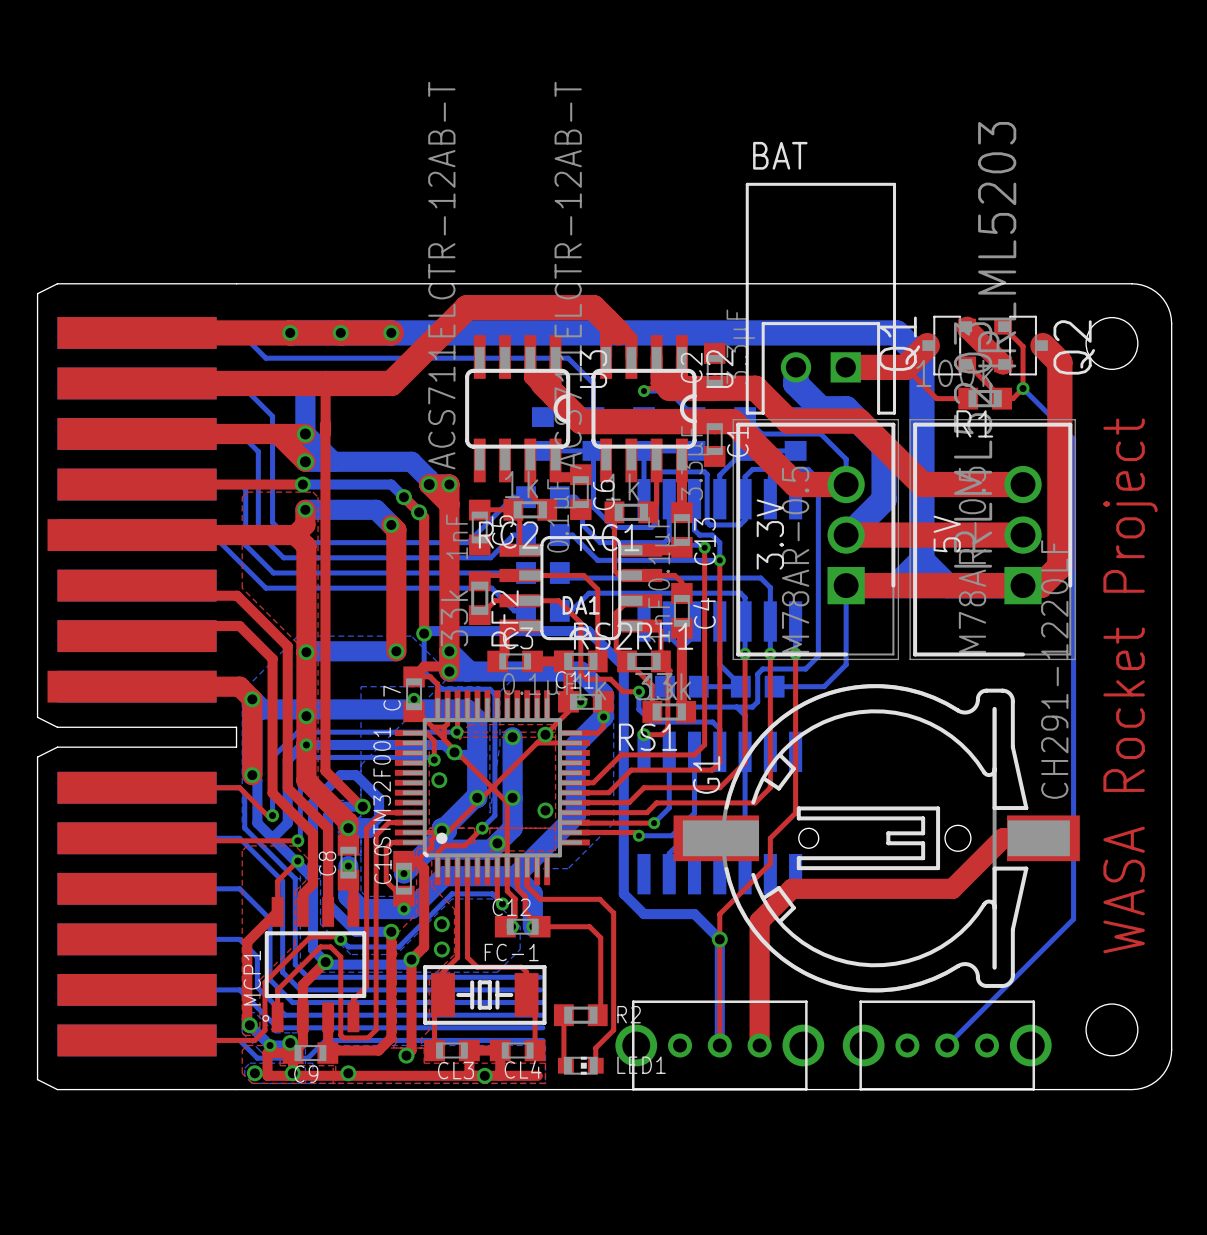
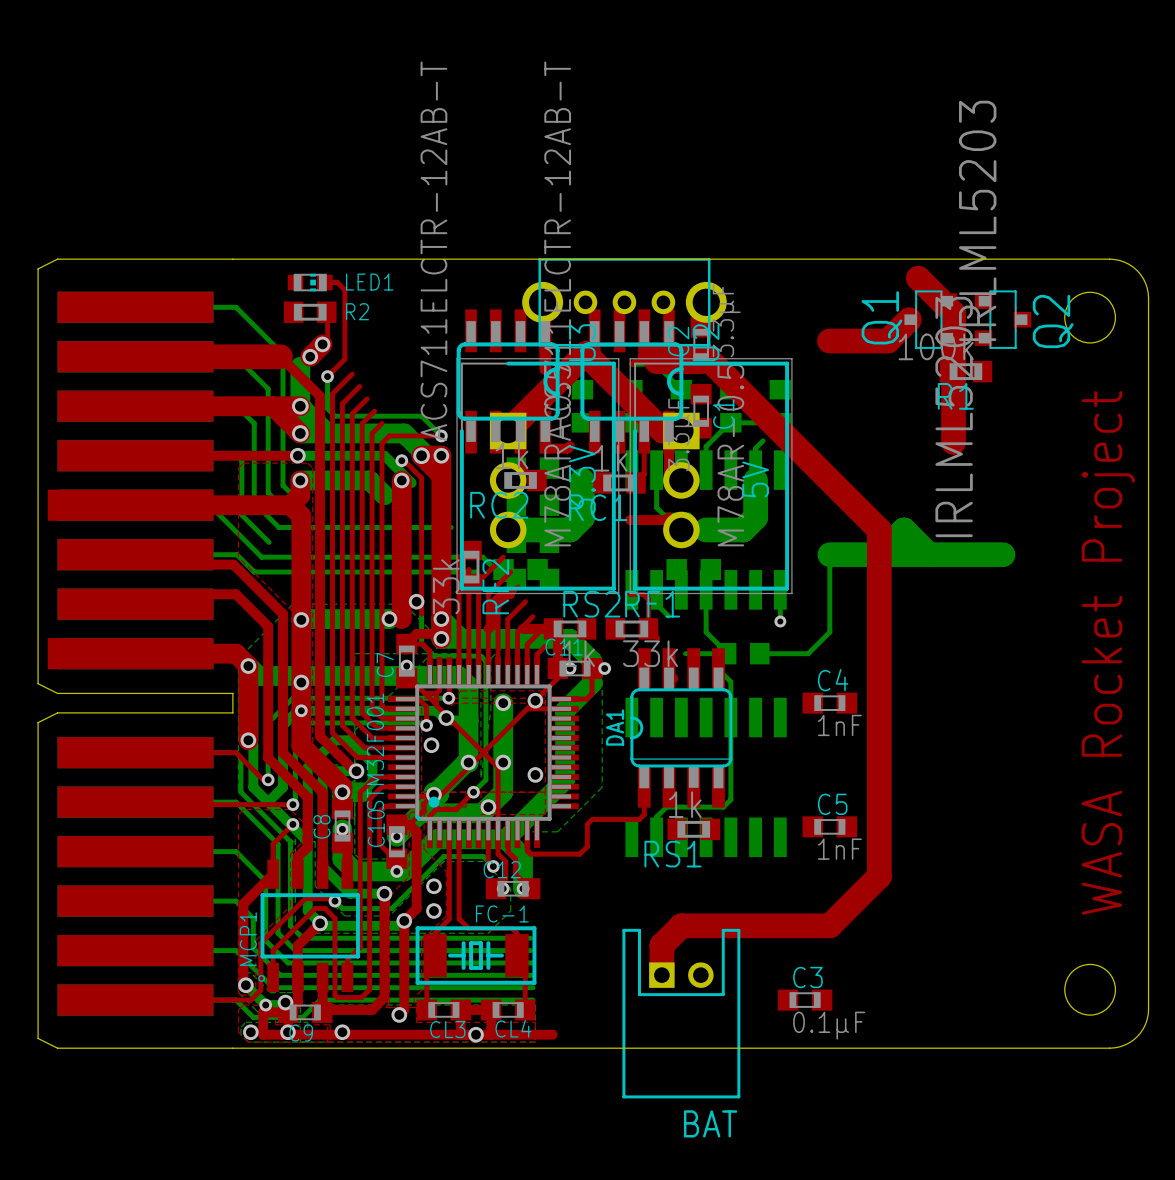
BAT: (820, 298) -> none
top track: none -> (918, 278) (953, 313) (953, 442)
top track: none -> (324, 282) (337, 282) (344, 289) (344, 359) (327, 376)
top track: (967, 326) (1003, 364) -> none
top track: (1003, 326) (1023, 346) (1023, 388) (1012, 398) (1002, 398) (967, 364) -> none
part: none -> (624, 302)
top track: (137, 332) (391, 332) -> none
bottom track: (239, 332) (265, 358) (568, 358) (593, 383) (593, 417) -> (236, 307) (283, 354) (283, 485) (295, 497)
bottom track: (290, 332) (896, 332) (921, 358) (921, 560) -> none
via: (290, 332) -> none
via: (340, 332) -> none
via: (391, 332) -> none
top track: none -> (326, 312) (327, 339) (310, 356)
top track: (1042, 345) (1059, 362) (1059, 566) (1040, 585) (846, 585) -> none
top track: (530, 357) (530, 378) (535, 383) (542, 383) (581, 421) (732, 421) (795, 484) (846, 484) -> none
top track: (631, 357) (631, 337) (626, 332) (618, 332) (593, 307) (467, 307) (391, 383) (285, 383) -> (320, 396) (280, 356)
bottom track: (796, 367) (795, 383) (820, 408) (846, 408) (884, 446) (884, 499) (848, 535) (846, 535) -> none
top track: (905, 367) (936, 398) (968, 398) -> none
via: none -> (322, 344)
via: none -> (310, 356)
top track: (325, 383) (325, 433) -> none
top track: none -> (661, 356) (706, 356) (879, 529) (879, 876) (829, 925) (681, 925) (661, 945) (661, 975)
top track: (714, 388) (755, 388) (788, 421) (859, 421) (922, 484) (1023, 484) -> none
bottom track: (1023, 388) (1073, 439) (1073, 919) (947, 1045) -> none
via: (1023, 388) -> none
via: (644, 391) -> none
top track: none -> (352, 374) (332, 393) (332, 732) (357, 757) (402, 757)
bottom track: none -> (327, 376) (327, 408) (334, 416) (421, 416) (441, 435)
via: none -> (327, 376)
top track: none -> (359, 386) (342, 403) (342, 725) (364, 747) (402, 747)
bottom track: (745, 417) (761, 434) (820, 434) (846, 459) (846, 484) -> none
top track: none -> (367, 398) (352, 413) (352, 718) (372, 738) (402, 738)
part: (542, 434) -> none
top track: none -> (374, 411) (362, 423) (362, 713) (377, 728) (402, 728)
bottom track: (542, 450) (593, 450) (593, 507) (613, 527) (651, 527) (656, 522) (656, 474) (659, 471) (704, 471) (707, 474) (707, 522) (709, 524) (740, 524) (745, 519) (745, 476) (752, 469) (808, 469) (818, 479) (818, 656) (805, 669) (762, 669) (757, 674) (757, 701) (752, 707) (690, 707) (680, 697) (680, 648) (694, 635) (694, 621) -> none
top track: none -> (381, 423) (372, 433) (372, 708) (382, 718) (402, 718)
top track: none -> (508, 431) (585, 353) (662, 431) (681, 431)
top track: none -> (441, 435) (389, 435) (381, 443) (381, 705) (385, 708) (402, 708)
via: none -> (441, 435)
top track: none -> (401, 460) (404, 460) (421, 478) (421, 614)
via: none -> (401, 460)
C6 side: top (580, 492) -> bottom (520, 569)
top track: (403, 497) (424, 517) (424, 633) -> none
via: (403, 497) -> none
bottom track: (526, 497) (513, 497) (467, 542) (292, 542) -> none
bottom track: (559, 497) (575, 497) (582, 504) (582, 524) (600, 542) (664, 542) (669, 537) -> none
bottom track: (694, 499) (694, 530) (699, 535) (712, 535) (719, 542) (719, 560) -> (755, 480) (755, 517) (743, 529) (706, 529)
top track: none -> (401, 480) (401, 619)
via: none -> (401, 480)
top track: (480, 509) (513, 509) (519, 516) (519, 550) -> none
bottom track: none -> (582, 480) (582, 517) (570, 529) (508, 529)
via: (419, 512) -> none
top track: (614, 512) (614, 570) (619, 575) (674, 575) (681, 582) (681, 593) -> none
top track: (391, 524) (396, 530) (396, 651) -> none
via: (391, 524) -> none
C5 rotation: 0° (479, 527) -> 90° clockwise (829, 826)
C5 position: (479, 527) -> (829, 826)
C13 side: top (681, 530) -> bottom (693, 569)
bottom track: (526, 535) (513, 535) (490, 557) (459, 557) -> none
bottom track: (559, 535) (572, 535) (597, 560) (694, 560) -> none
top track: (846, 535) (1023, 535) -> none
3.3V rotation: 0° (815, 539) -> 180° (537, 476)
3.3V position: (815, 539) -> (537, 476)
5V rotation: 0° (992, 539) -> 180° (711, 476)
5V position: (992, 539) -> (711, 476)
top track: (704, 547) (704, 744) (694, 754) (621, 754) (593, 782) (574, 782) -> none
via: (704, 547) -> none
top track: (719, 560) (719, 762) (712, 770) (631, 770) (608, 792) (574, 792) -> none
via: (719, 560) -> none
bottom track: (273, 572) (526, 572) -> none
bottom track: (559, 572) (564, 578) (760, 578) (770, 587) (770, 653) -> none
top track: (479, 581) (485, 575) (583, 575) (597, 589) (597, 661) -> none
bottom track: none -> (135, 554) (236, 554) (254, 572) (476, 572)
top track: none -> (459, 556) (459, 671)
top track: none -> (503, 557) (478, 581) (478, 671)
DA1 rotation: 0° (580, 588) -> 90° clockwise (681, 727)
DA1 position: (580, 588) -> (681, 727)
top track: none -> (468, 569) (468, 671)
top track: (641, 600) (628, 600) (616, 612) (616, 649) (652, 685) (652, 711) -> none
top track: none -> (510, 572) (488, 594) (488, 671)
DA1 name position: DA1 (581, 605) -> DA1 (615, 727)
bottom track: (559, 610) (571, 610) (589, 593) (740, 593) (745, 597) (745, 653) -> none
C4 rotation: 0° (681, 610) -> 90° clockwise (829, 703)
C4 position: (681, 610) -> (829, 703)
top track: (479, 615) (495, 600) (558, 600) (580, 623) (580, 673) (586, 679) (610, 679) (623, 691) (638, 691) -> none
top track: none -> (518, 586) (498, 606) (498, 671)
top track: (681, 628) (681, 701) -> none
top track: none -> (525, 601) (507, 619) (507, 671)
top track: none -> (532, 616) (517, 631) (517, 671)
top track: (745, 653) (745, 762) (719, 787) (644, 787) (629, 802) (574, 802) -> none
via: (745, 653) -> none
top track: (770, 653) (770, 787) (755, 802) (656, 802) (646, 812) (574, 812) -> none
via: (770, 653) -> none
top track: (795, 653) (795, 813) (770, 838) (770, 863) (719, 914) (719, 1045) -> none
C3 position: (515, 661) -> (805, 1000)
top track: none -> (540, 631) (527, 644) (527, 671)
top track: (667, 668) (667, 728) (661, 734) (644, 734) -> none
bottom track: (429, 676) (424, 671) (424, 633) (426, 631) (588, 631) (623, 666) (623, 893) (644, 914) (694, 914) (719, 939) (719, 1045) -> (421, 643) (421, 614)
top track: none -> (545, 646) (537, 654) (537, 671)
part: (681, 686) -> none
bottom track: (638, 691) (638, 709) (651, 722) (712, 722) (719, 729) (719, 751) -> none
via: (638, 691) -> none
RS1 position: (669, 711) -> (693, 829)
via position: (603, 717) -> (604, 668)
via: (644, 734) -> none
bottom track: (669, 751) (669, 807) (654, 823) -> none
bottom track: (694, 751) (694, 813) (671, 835) (638, 835) -> none
top track: (574, 822) (654, 823) -> none
via: (654, 823) -> none
top track: none -> (644, 787) (644, 814) (639, 819) (592, 819) (587, 824) (587, 846) (579, 854) (530, 854) (527, 850) (527, 833)
top track: (574, 832) (635, 832) (638, 835) -> none
via: (638, 835) -> none
G1: CH291-1220LF (876, 838) -> none
top track: (1043, 838) (1003, 838) (952, 888) (791, 888) (759, 921) (759, 1045) -> none
top track: (527, 870) (527, 886) (540, 899) (599, 899) (613, 913) (613, 1030) (595, 1048) (595, 1065) -> none
top track: (540, 926) (589, 926) (600, 937) (600, 1013) (597, 1015) -> none
via: (719, 939) -> none
top track: (563, 1015) (563, 1063) (565, 1065) -> none
R2 position: (580, 1015) -> (310, 312)
part: (719, 1045) -> none
part: (947, 1045) -> none
BAT: none -> (681, 1013)
LED1 position: (580, 1065) -> (310, 282)
top track: none -> (527, 1034) (552, 1034)

